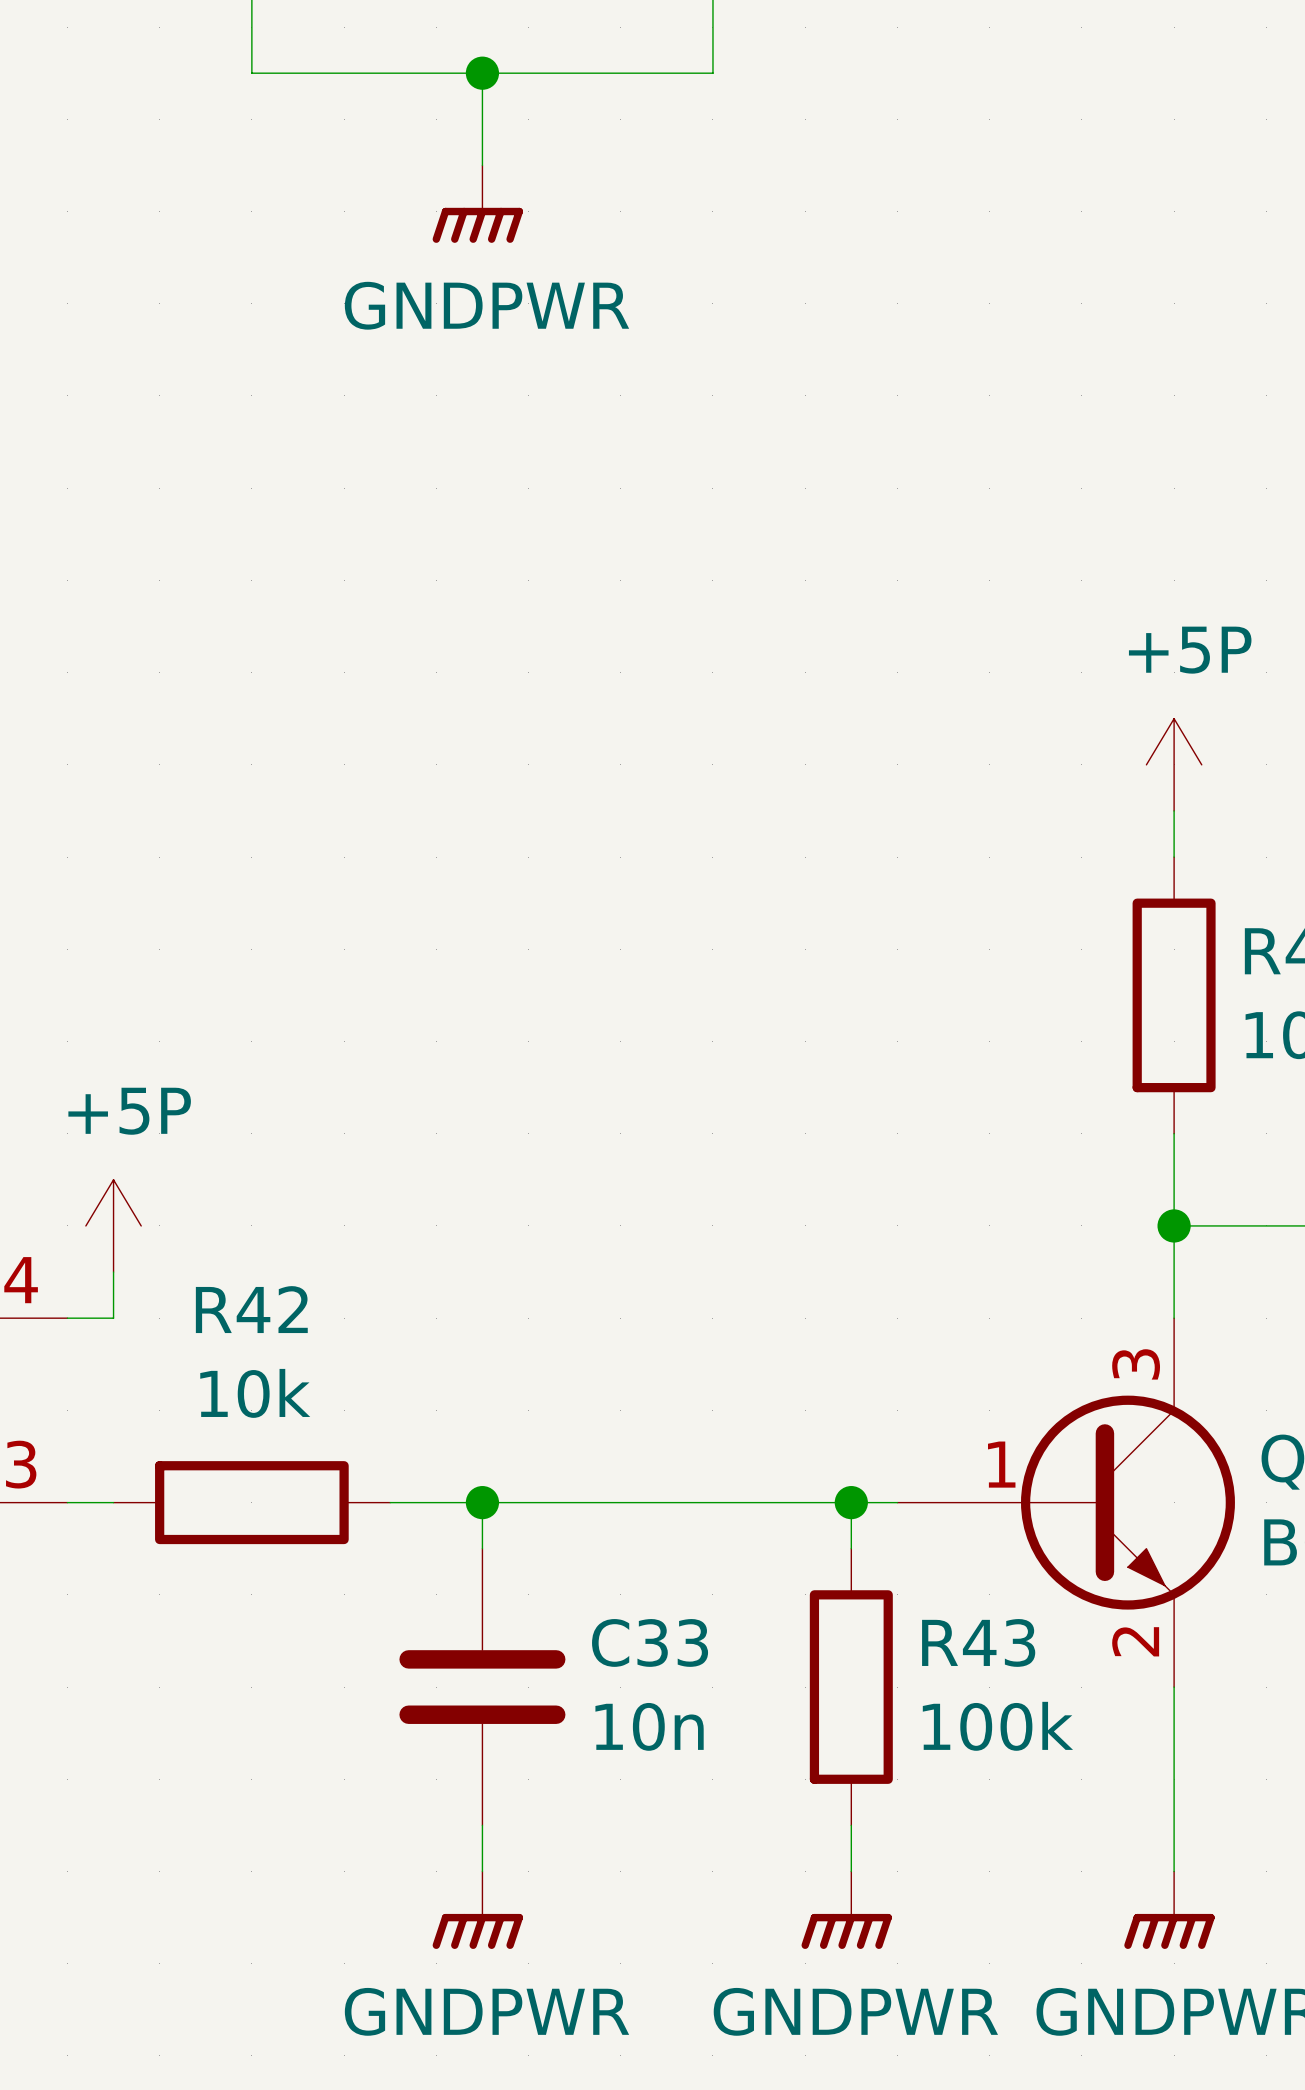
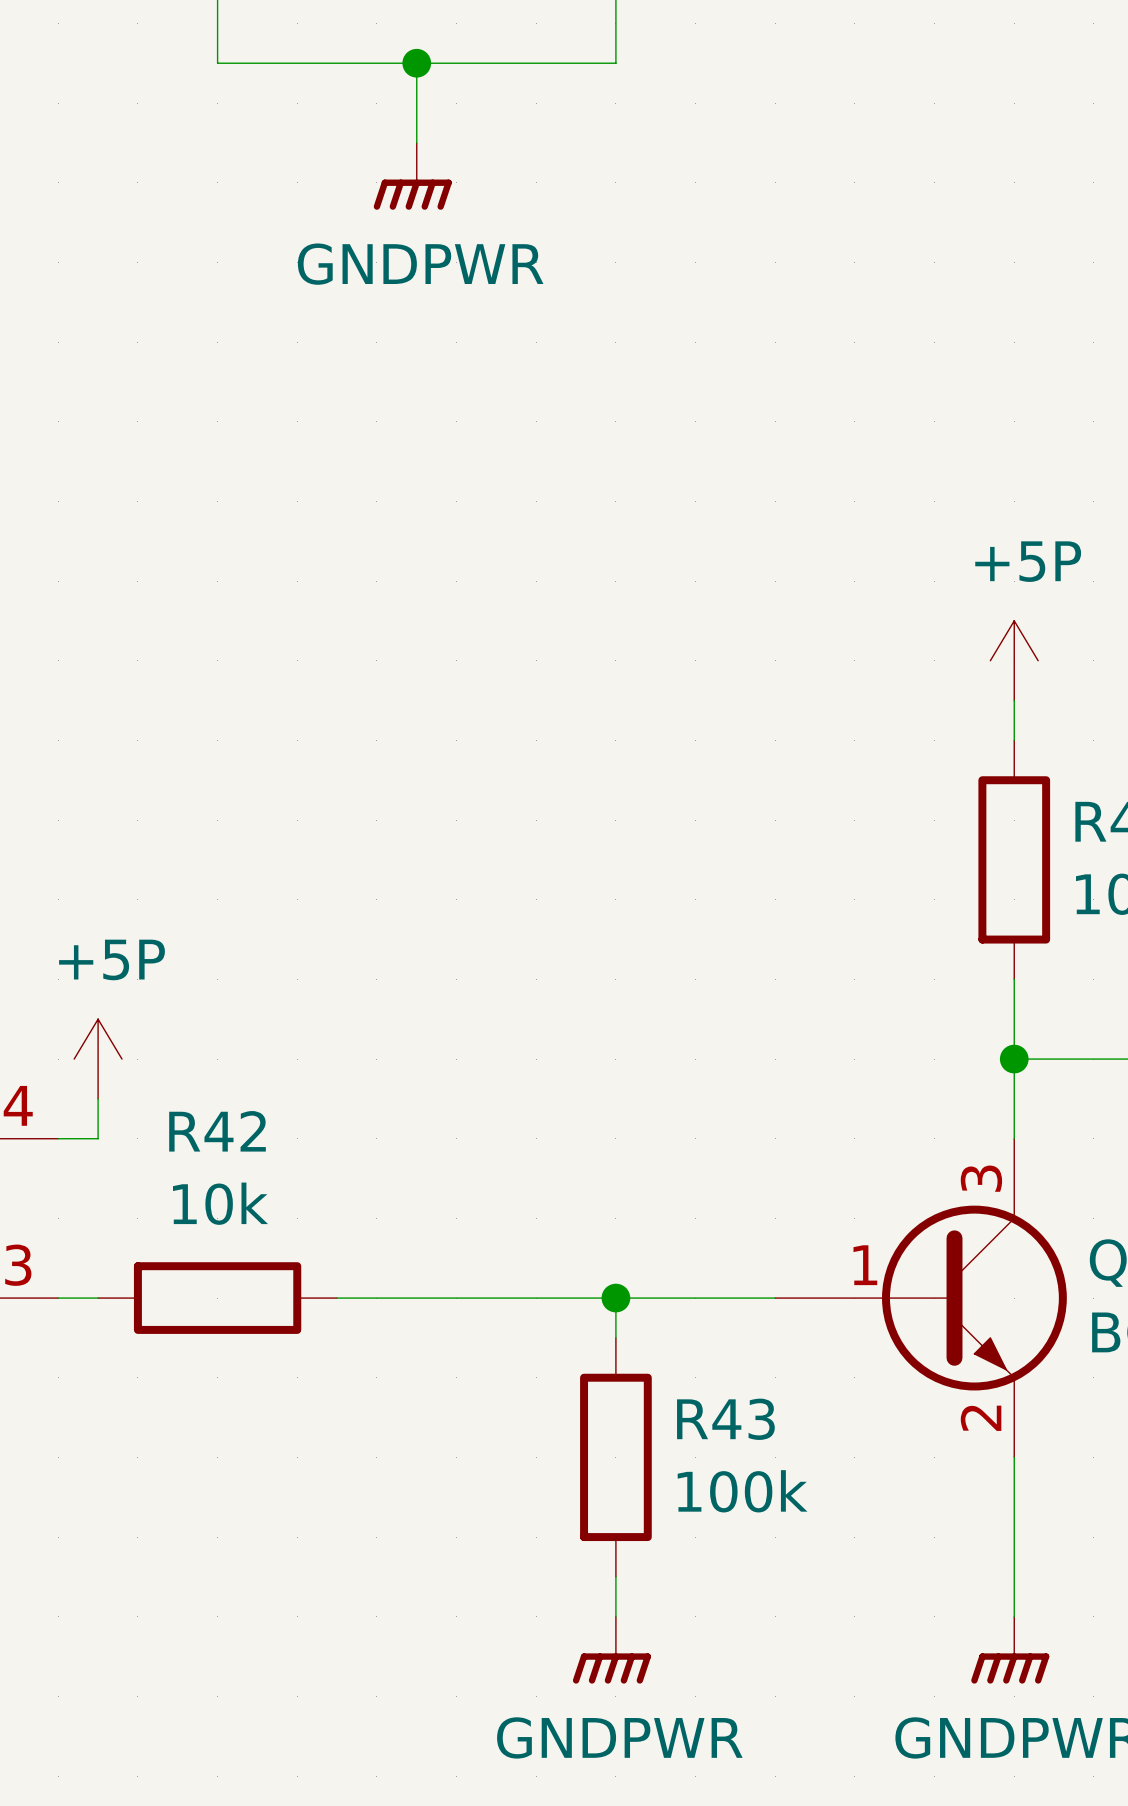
wire: (482, 1502) (482, 1548) -> none
junction: (482, 1502) -> none
junction: none -> (615, 1298)
wire: (851, 1502) (851, 1548) -> (615, 1298) (615, 1337)
junction: (851, 1502) -> none
C33: 10n (482, 1687) -> none
R43 position: (851, 1687) -> (615, 1457)
wire: (482, 1825) (482, 1871) -> none
wire: (851, 1825) (851, 1871) -> (615, 1576) (615, 1616)
power symbol: GNDPWR (477, 1910) -> none
power symbol: none -> GNDPWR (611, 1650)
power symbol: GNDPWR (846, 1910) -> none

